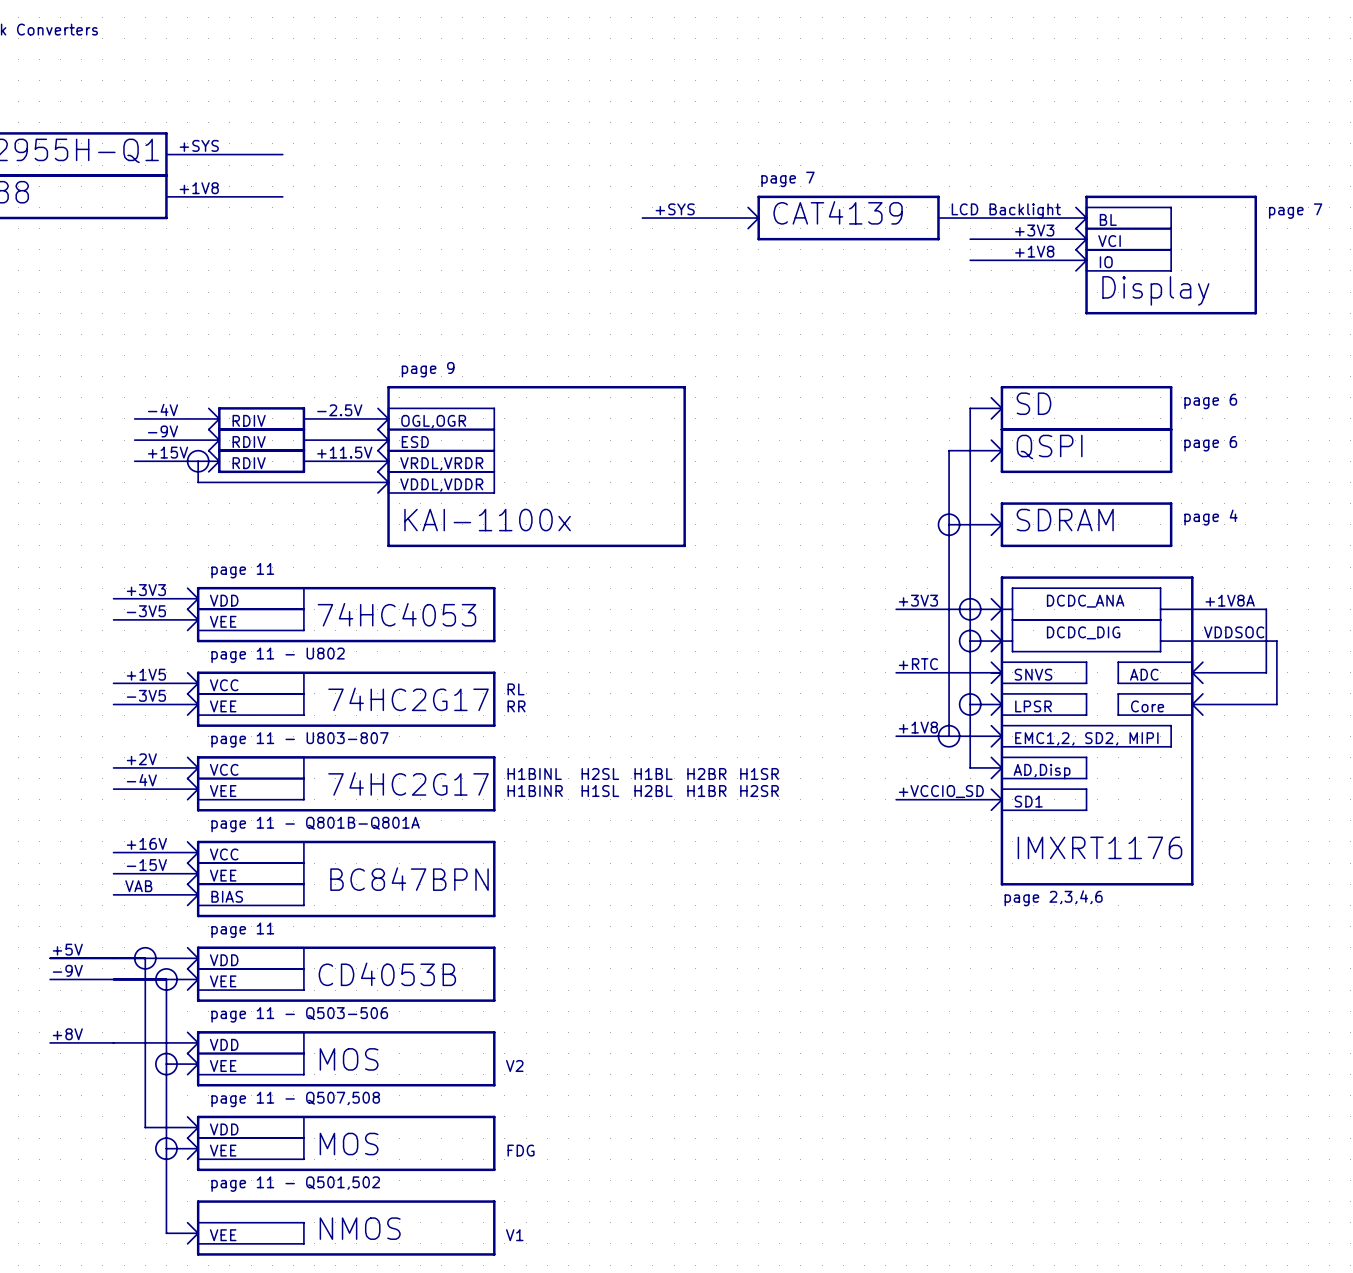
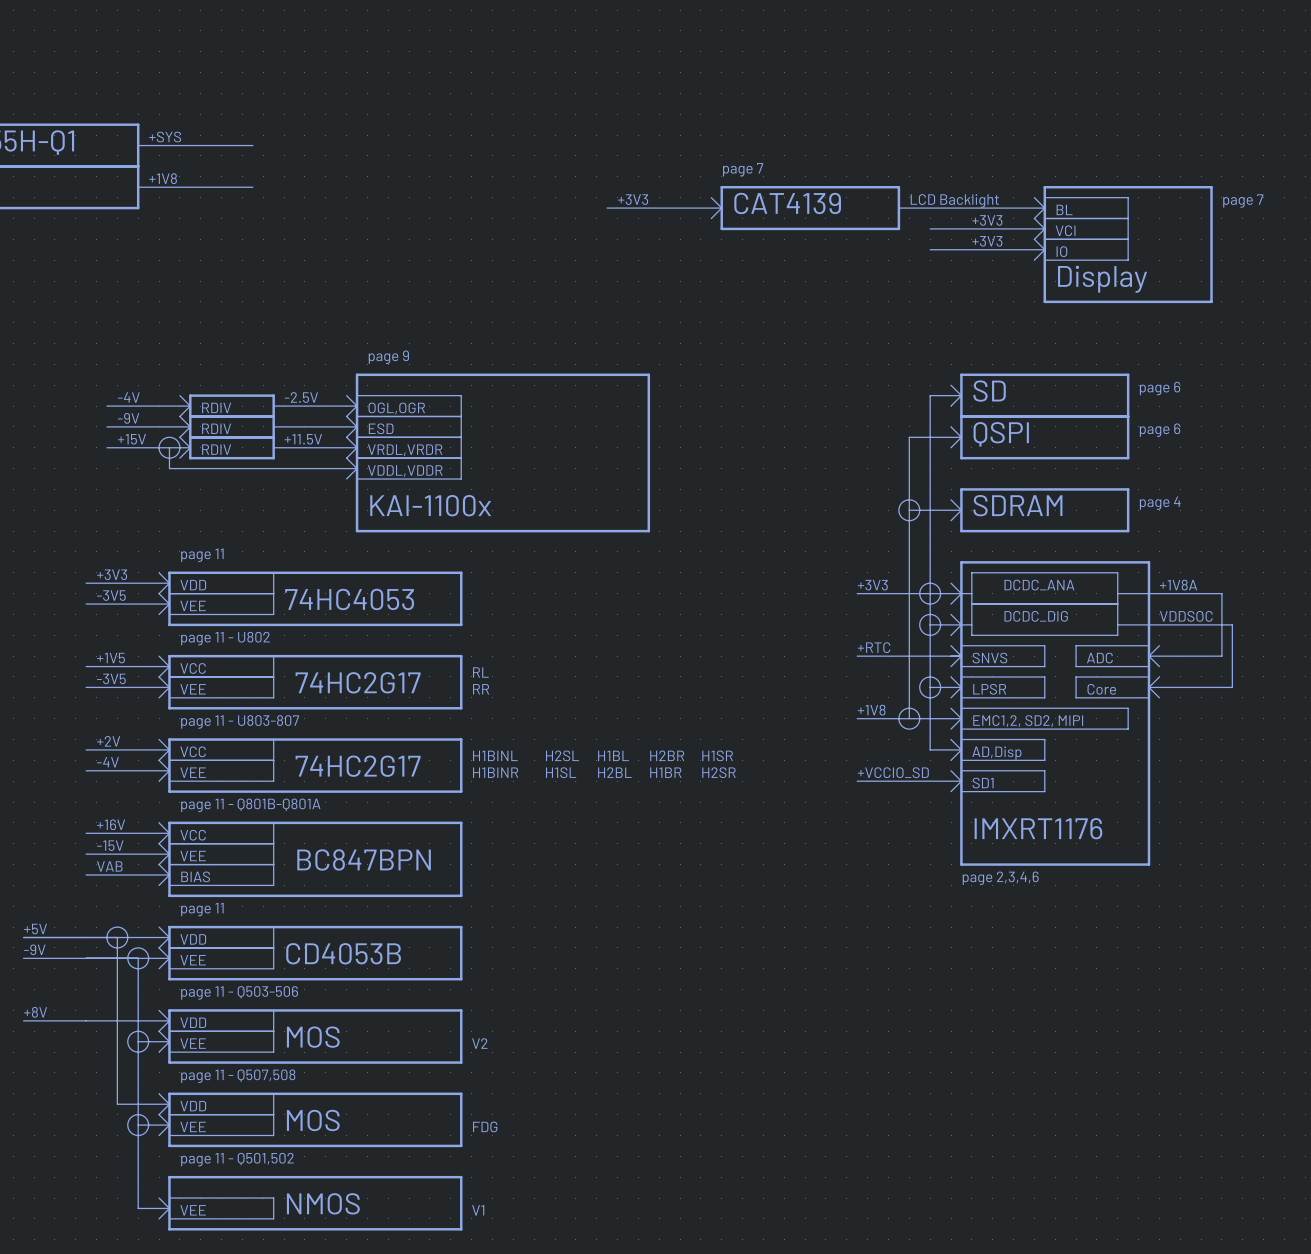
text: +SYS (675, 209) -> +3V3 (633, 199)
text: +1V8 (1034, 251) -> +3V3 (987, 241)

